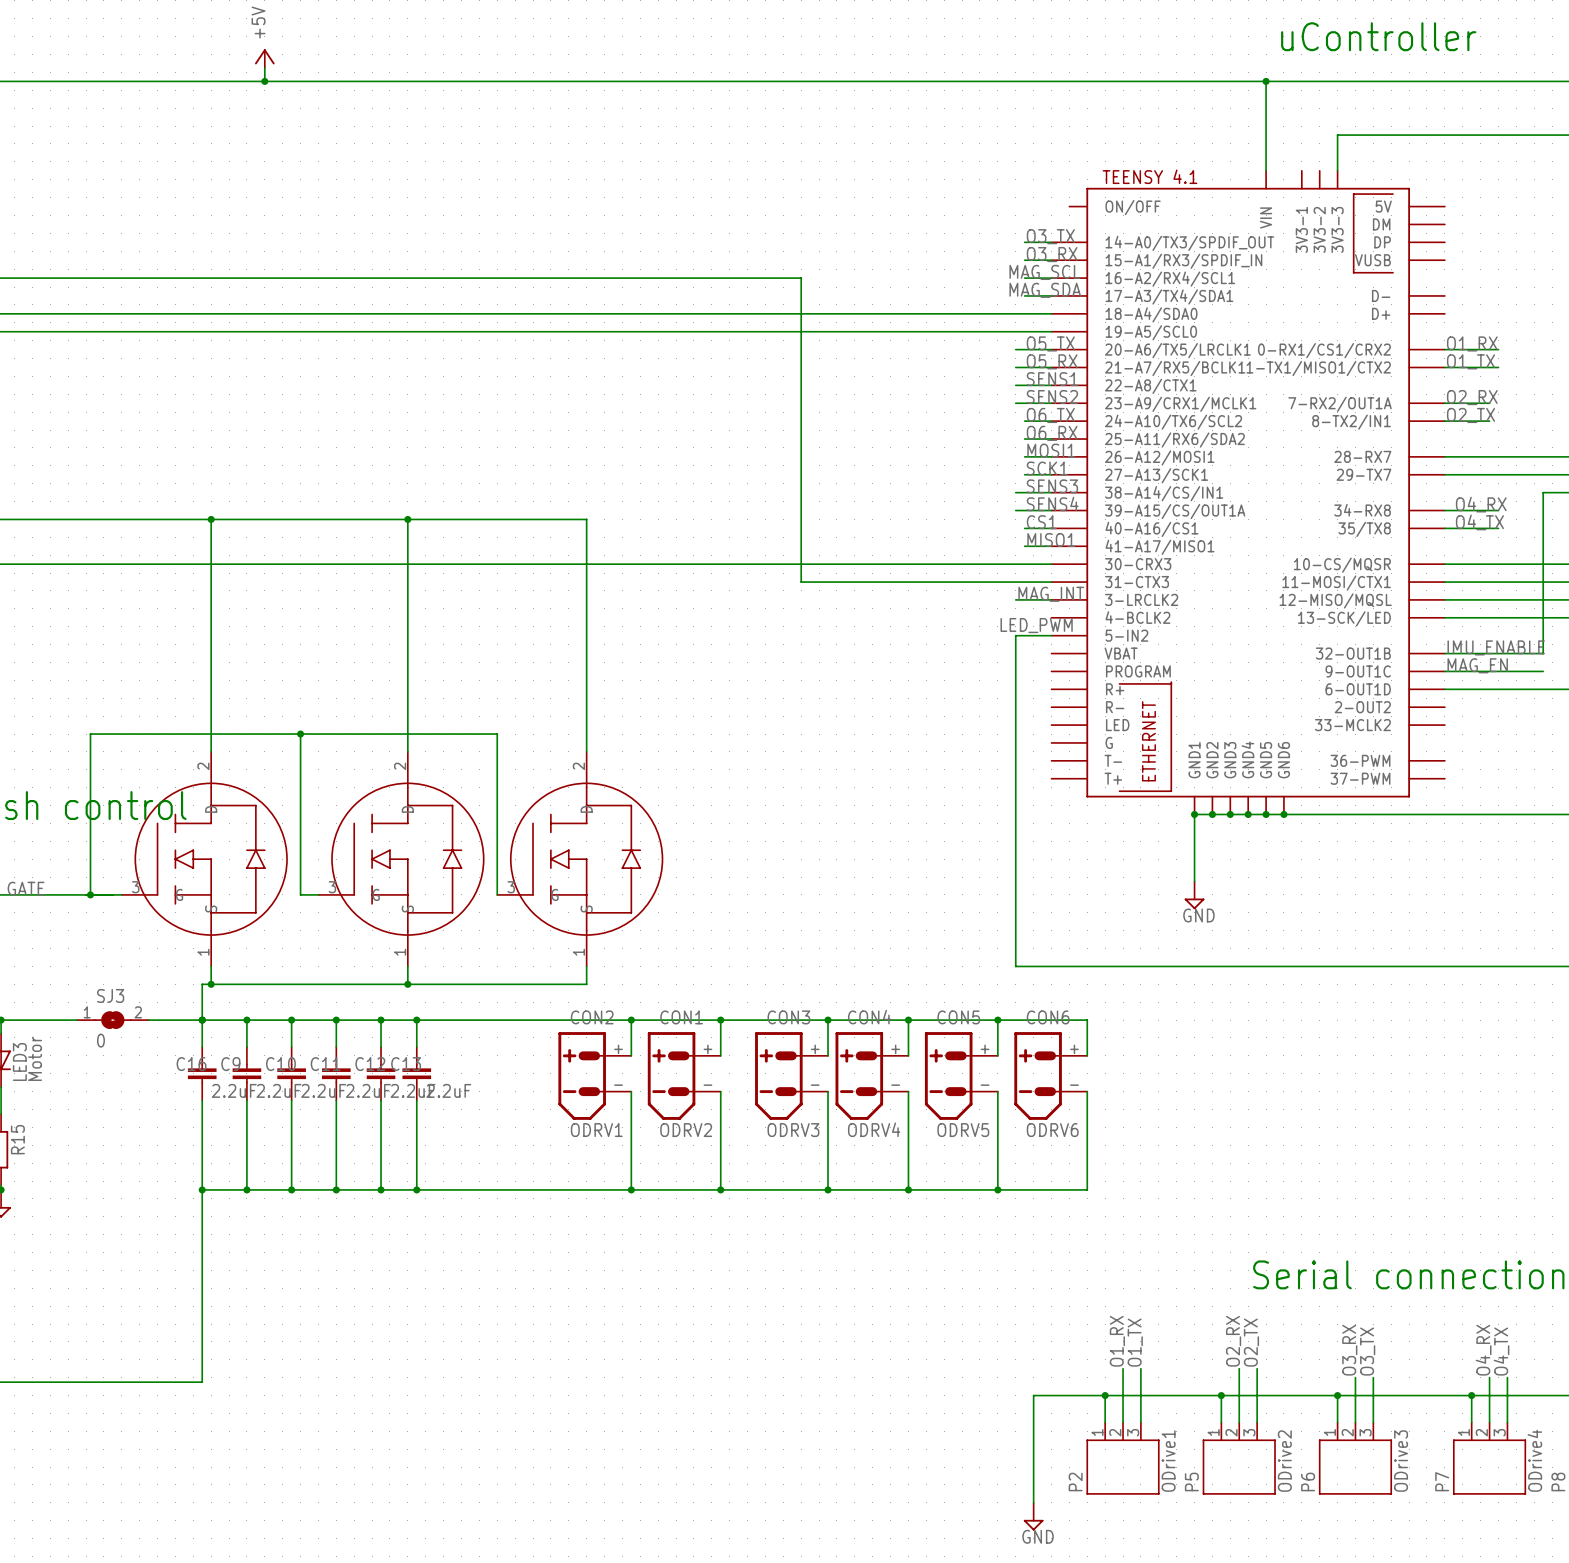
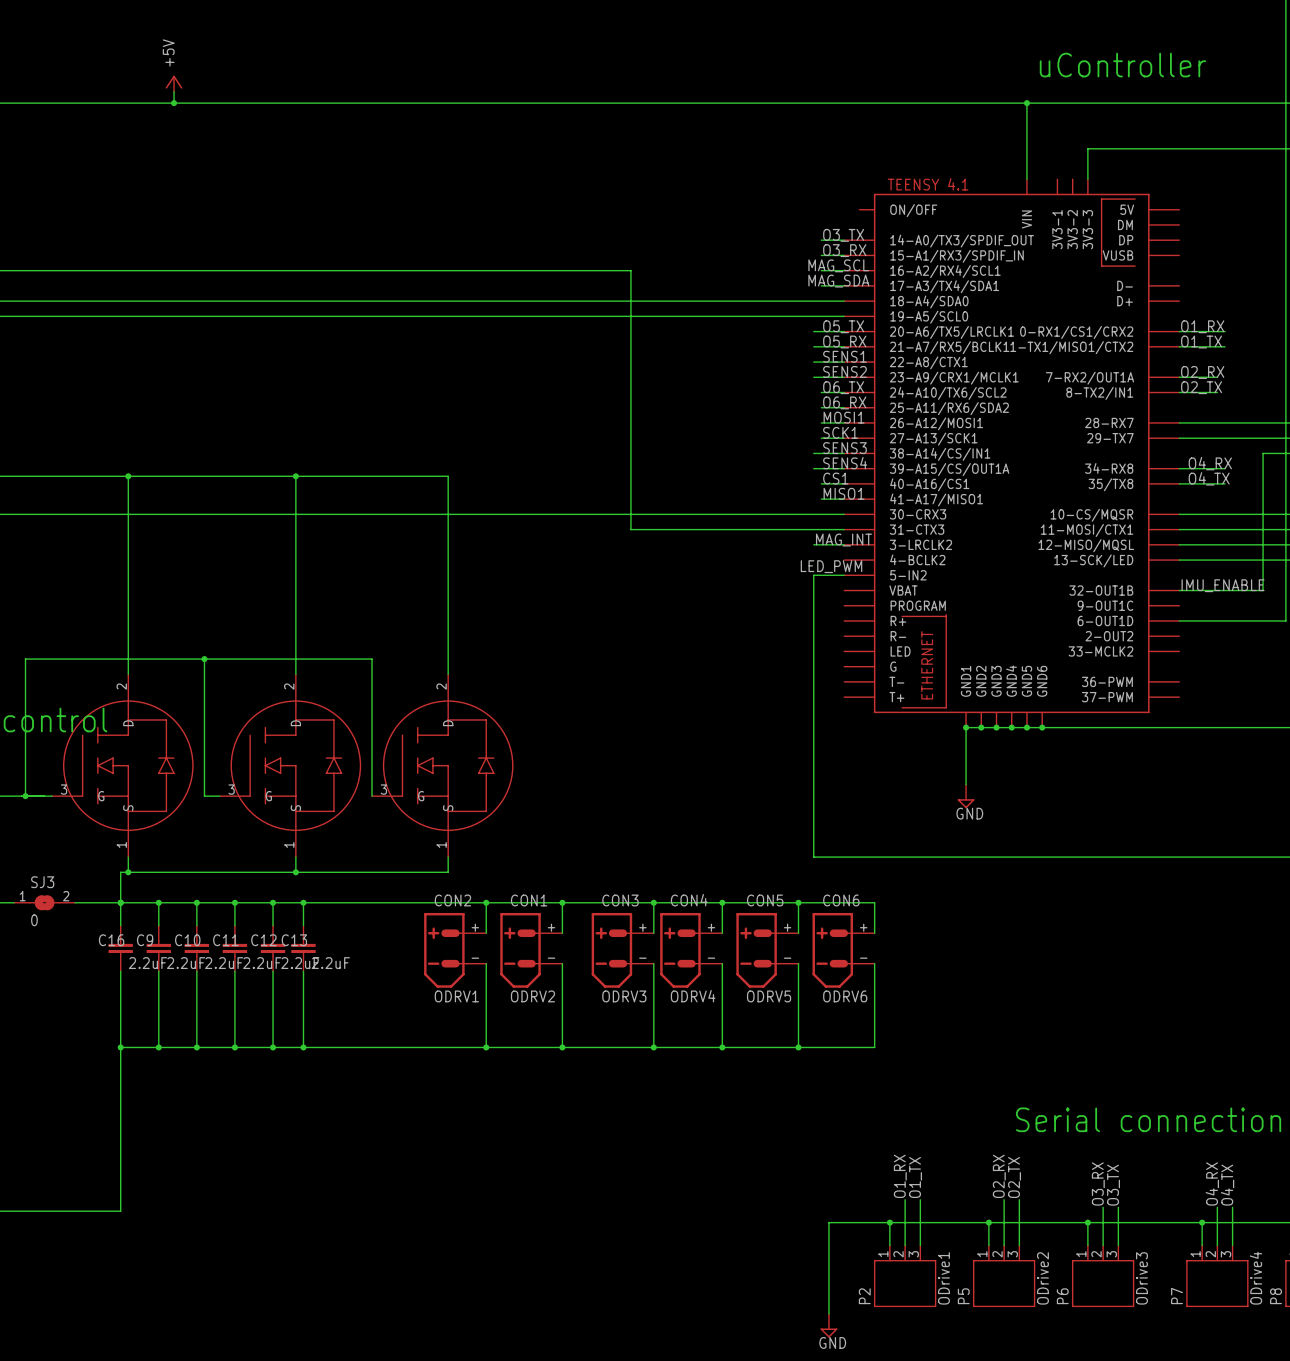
label: MAG_EN (1477, 665) -> none
wire: (1444, 671) (1543, 671) -> none

